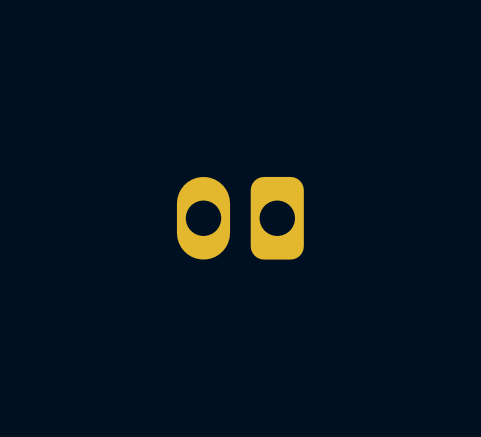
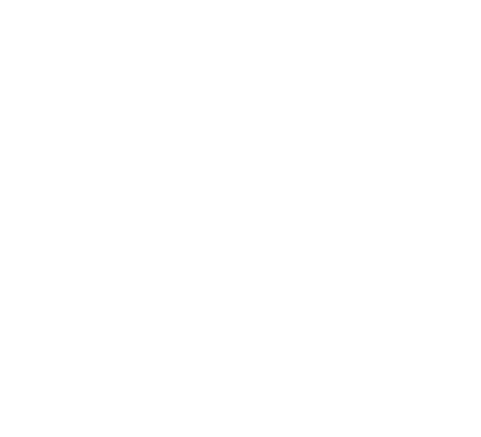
part: (240, 218) -> none

